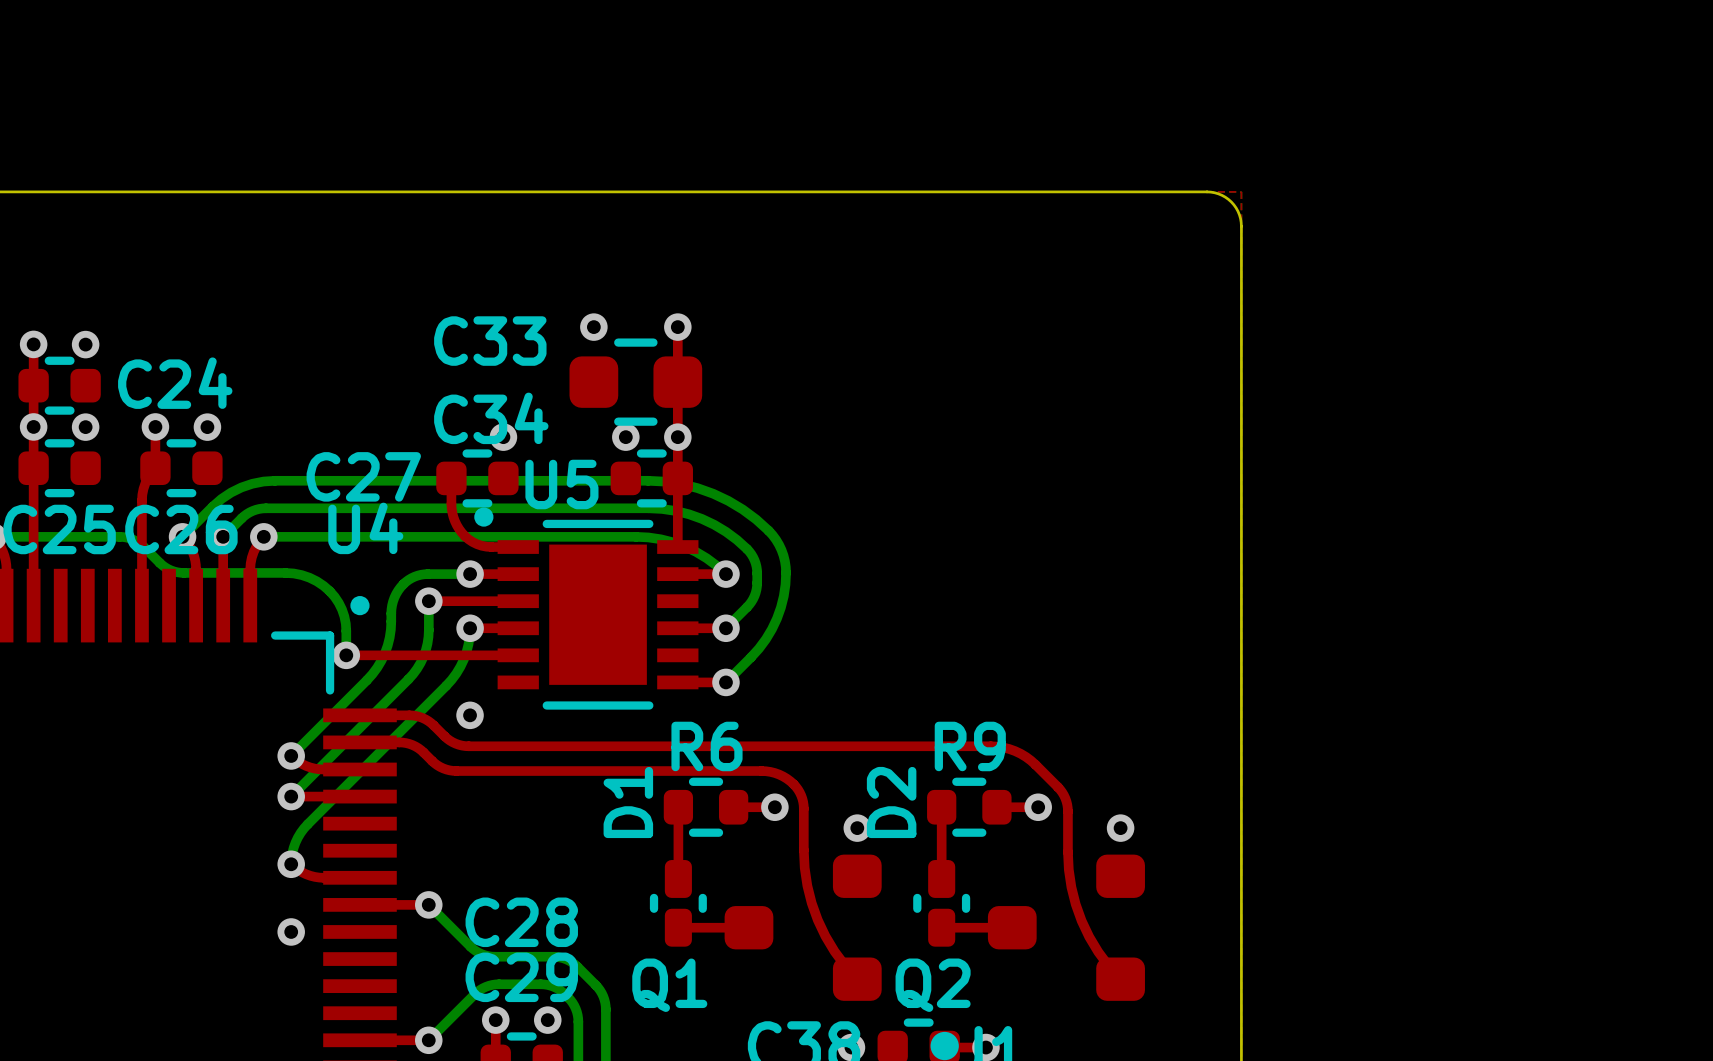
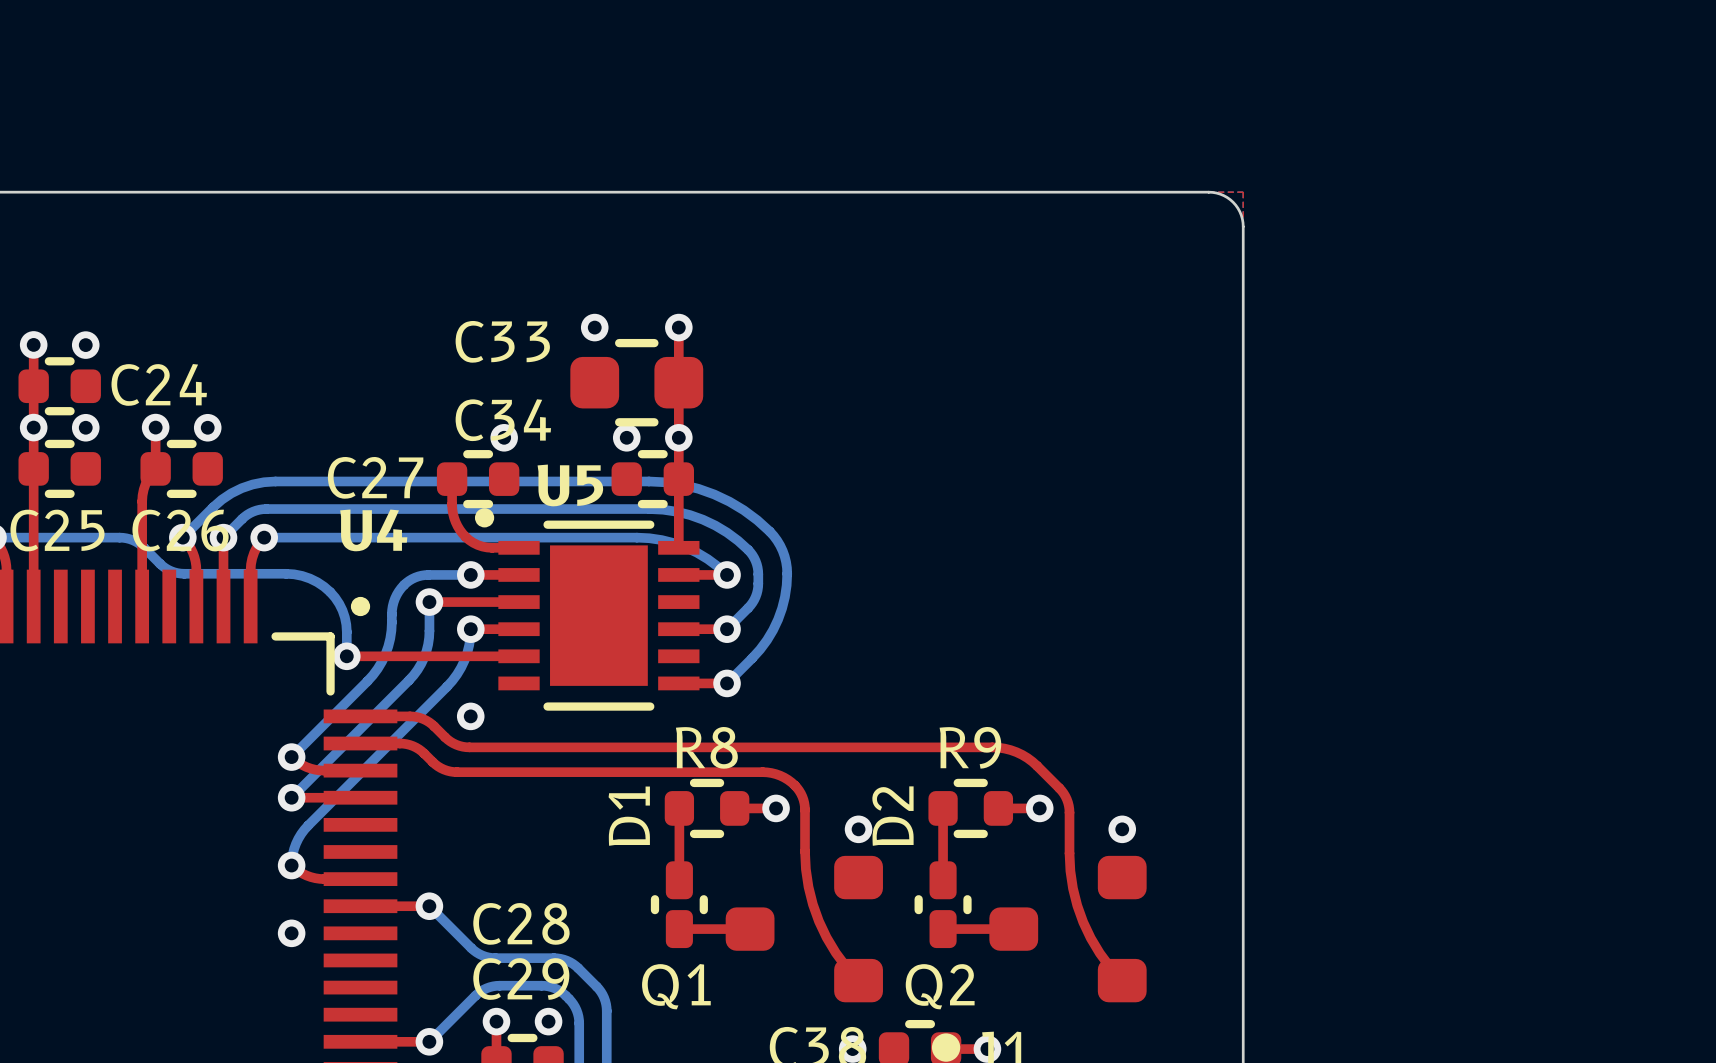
R6 name: R6 (706, 746) -> R8 (706, 747)

